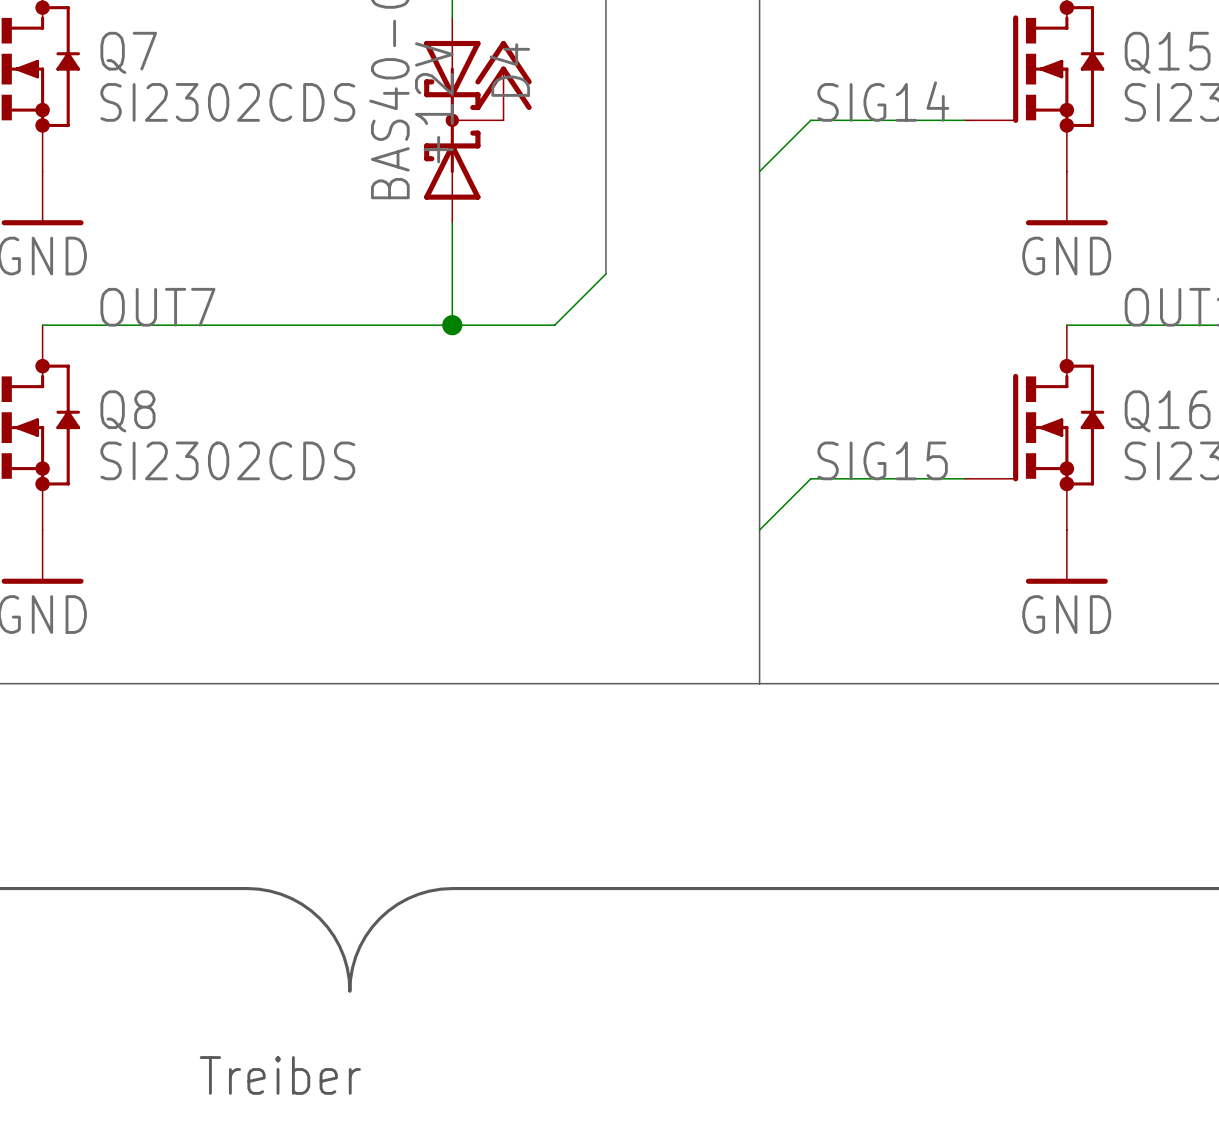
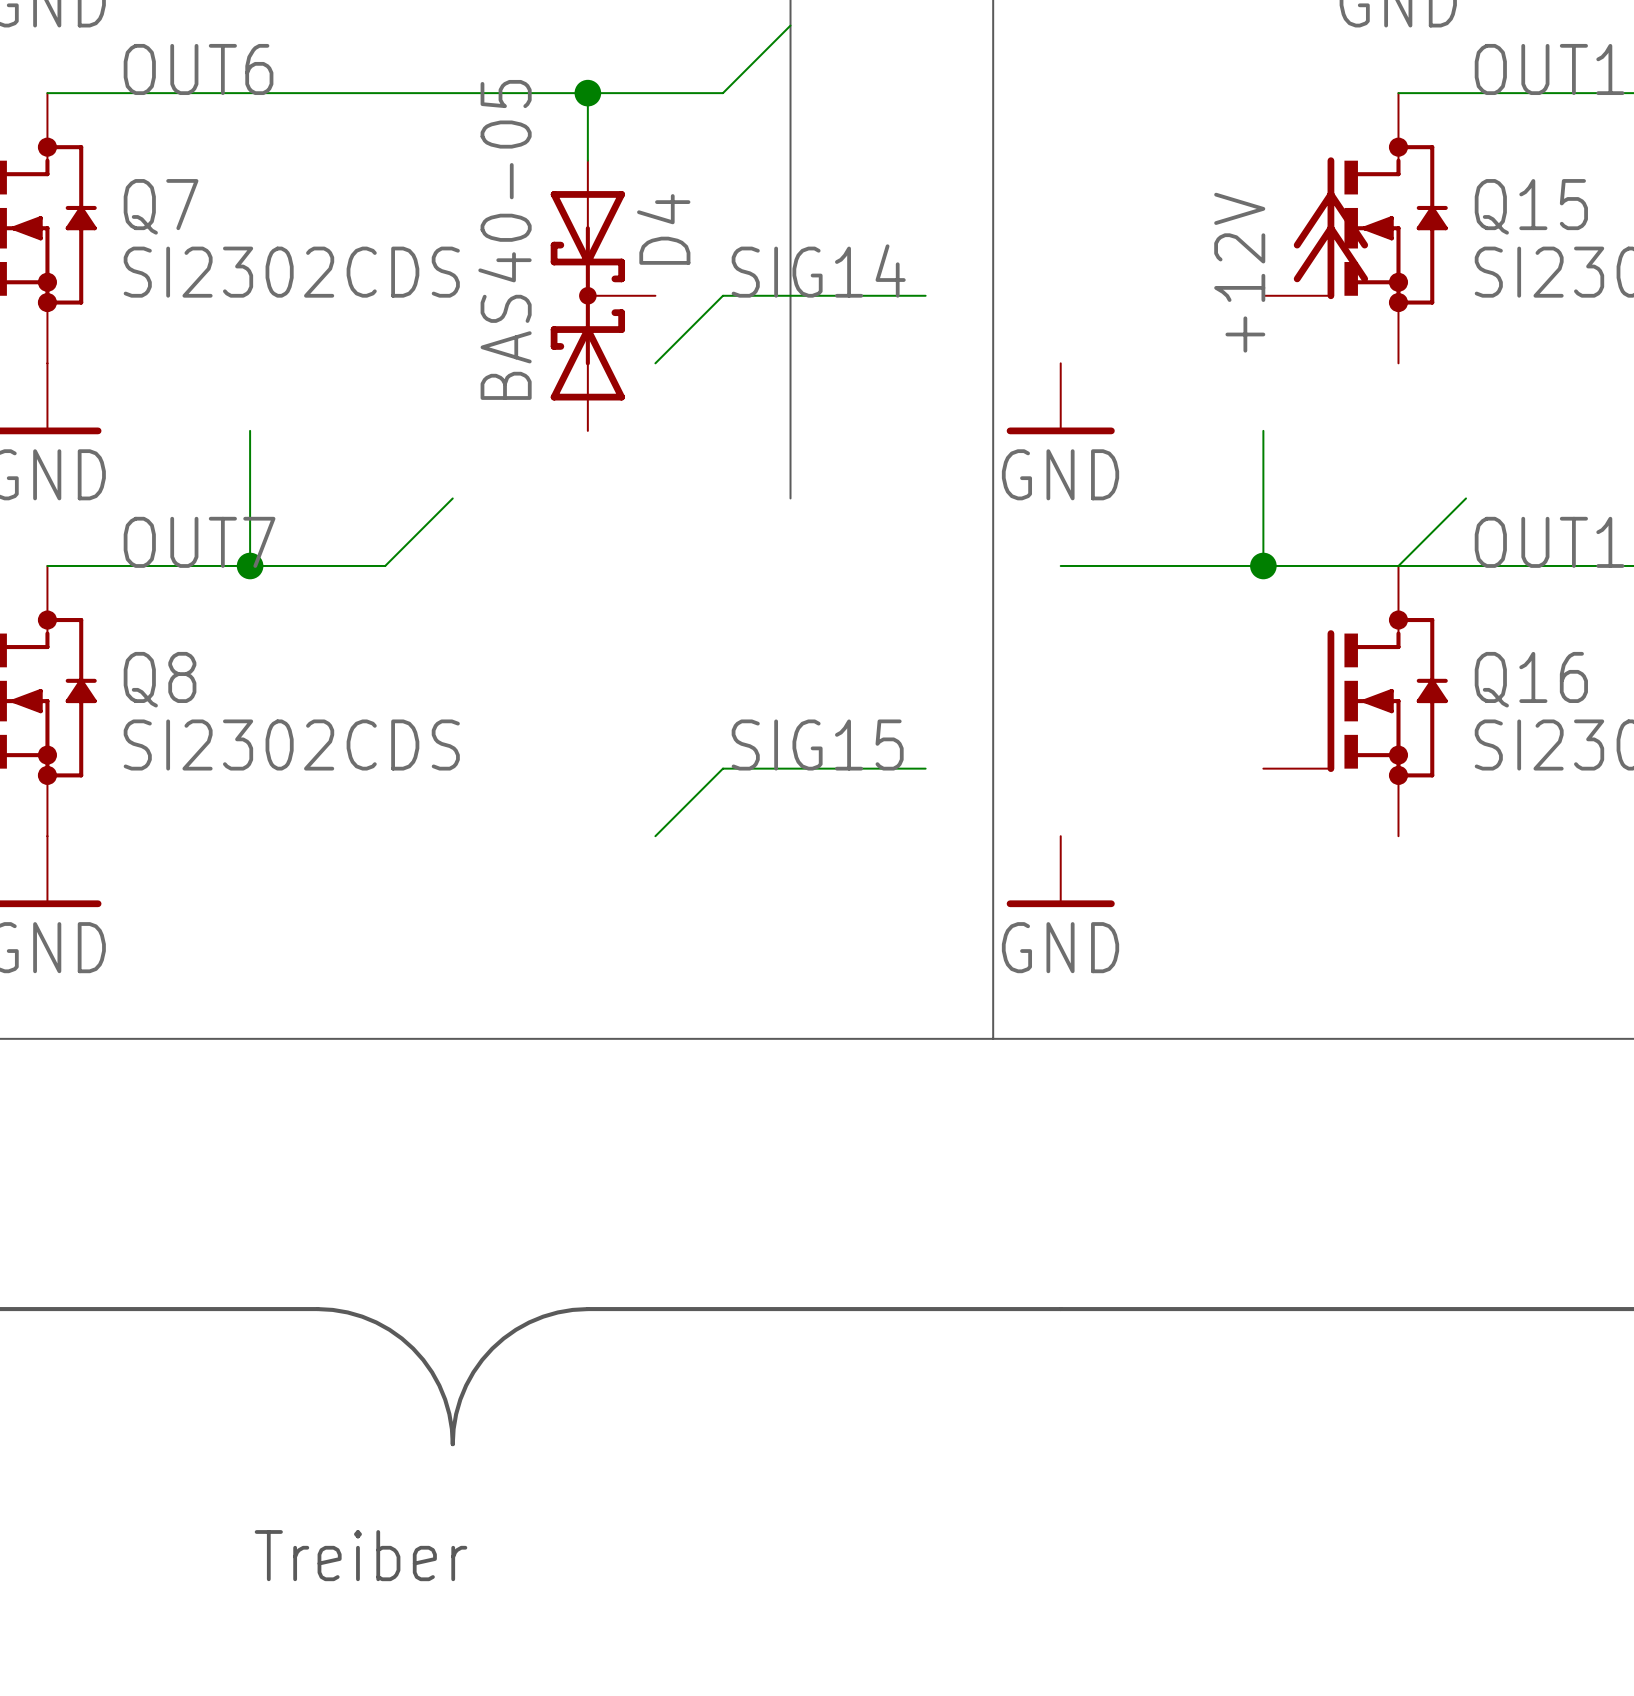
power symbol: +12V (503, 80) -> none
power symbol: none -> +12V (1330, 243)
label position: SIG14 (883, 101) -> SIG14 (818, 271)
wire: (964, 120) (810, 120) (759, 171) -> (925, 295) (722, 295) (655, 363)
power symbol: none -> GND (1060, 398)
power symbol: GND (1066, 198) -> none
wire: (452, 222) (452, 325) -> (250, 430) (250, 565)
wire: none -> (1263, 430) (1263, 565)
wire: (605, 273) (554, 325) (298, 325) -> (452, 498) (385, 565)
wire: none -> (1466, 498) (1398, 565) (1060, 565)
junction: none -> (250, 565)
junction: (452, 325) -> none
junction: none -> (1263, 565)
label position: SIG15 (882, 460) -> SIG15 (817, 745)
wire: (964, 478) (810, 478) (759, 530) -> (925, 768) (722, 768) (655, 836)
power symbol: none -> GND (1060, 871)
power symbol: GND (1066, 556) -> none

